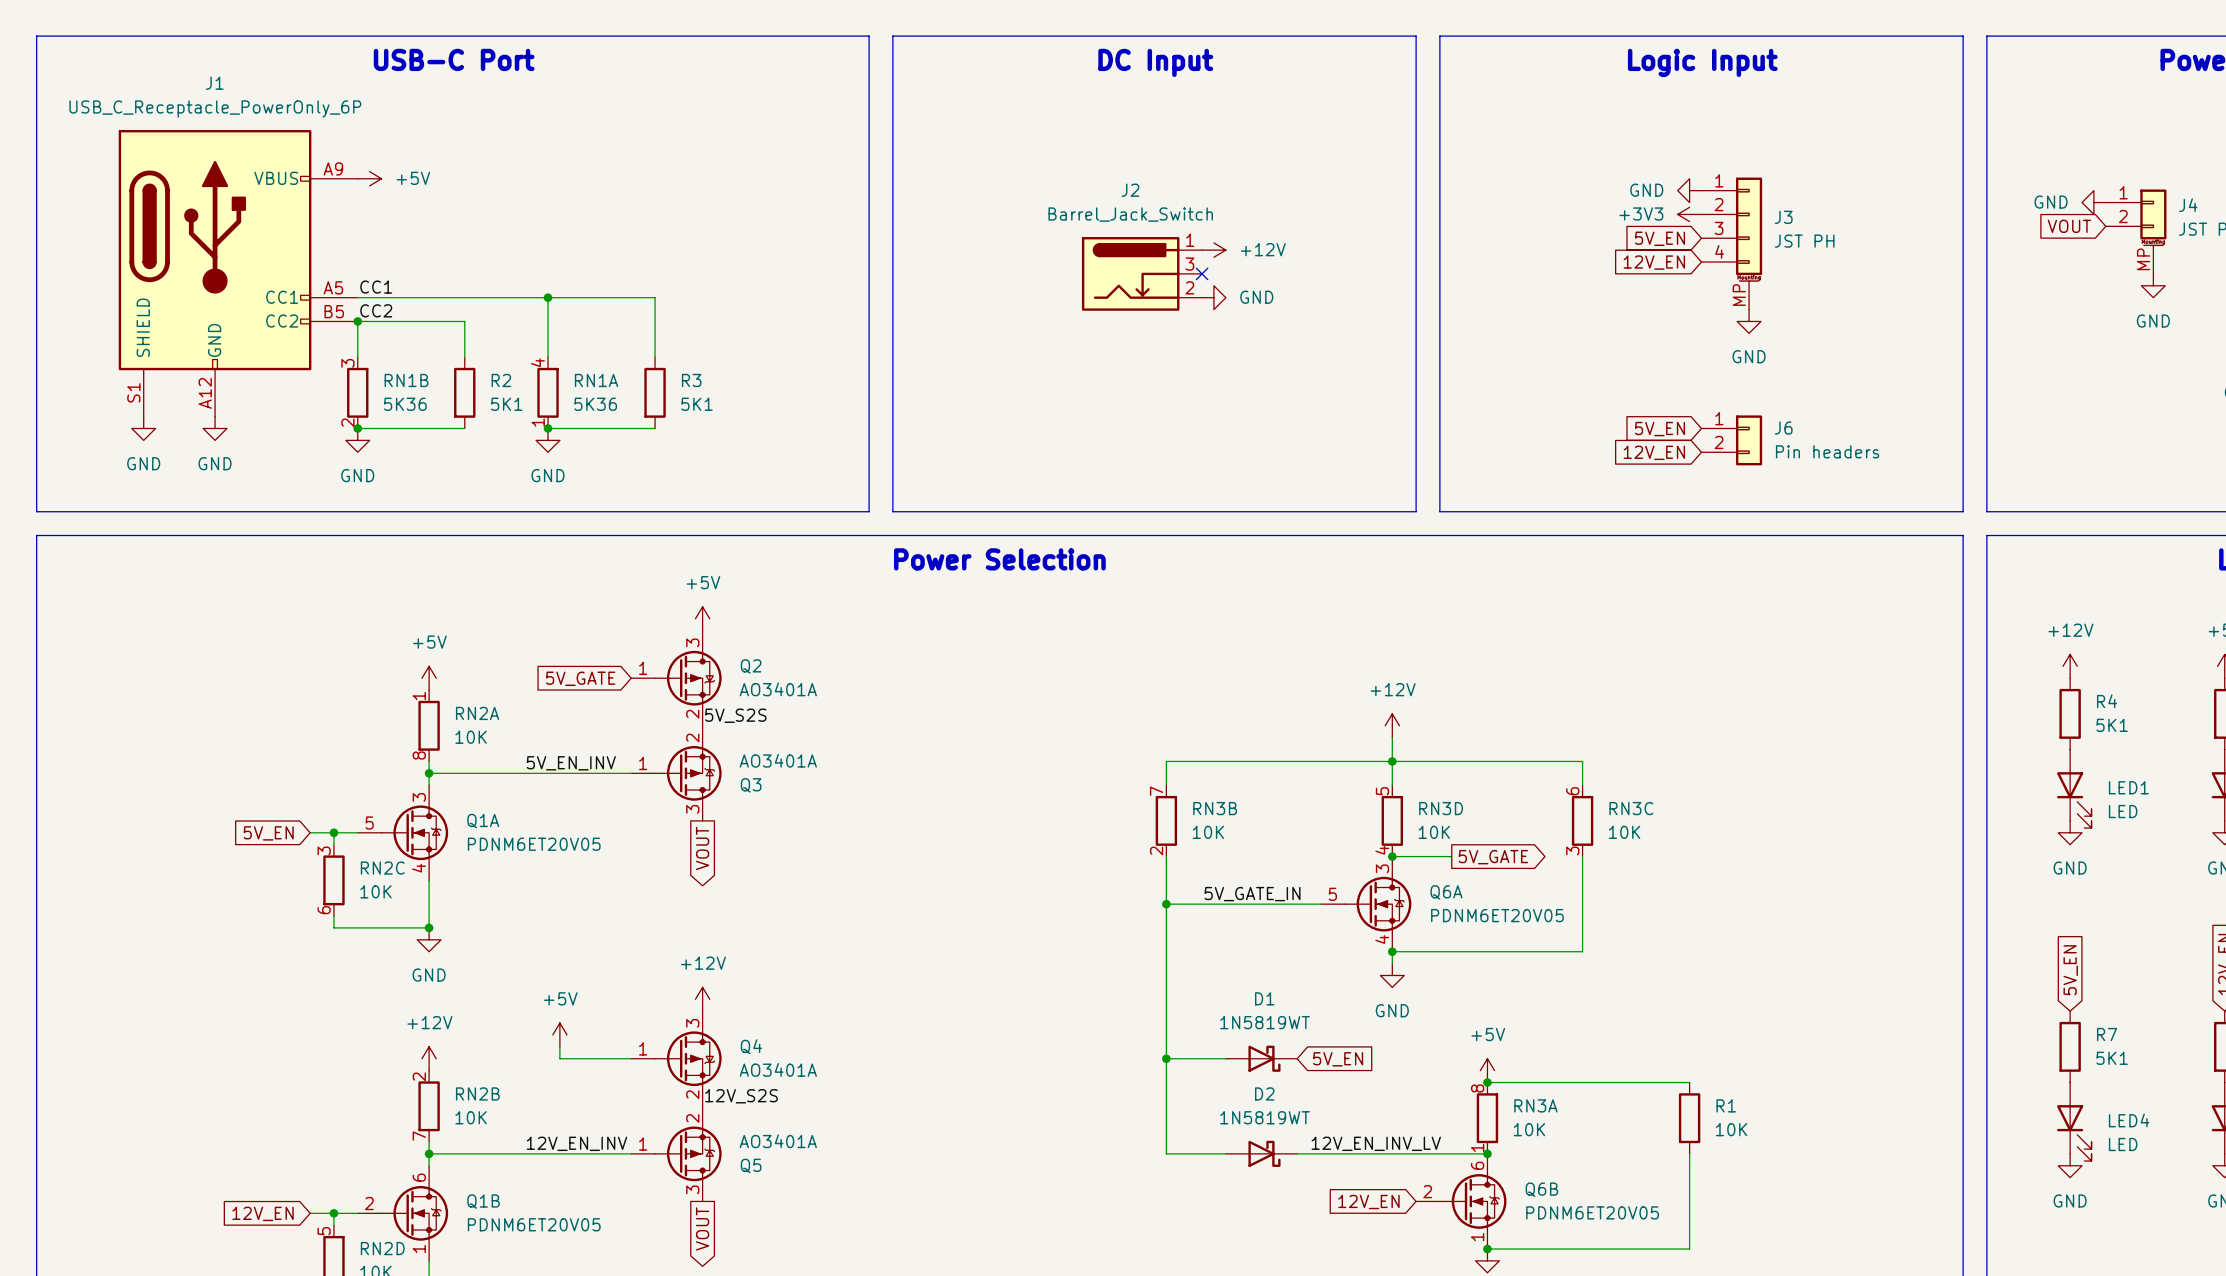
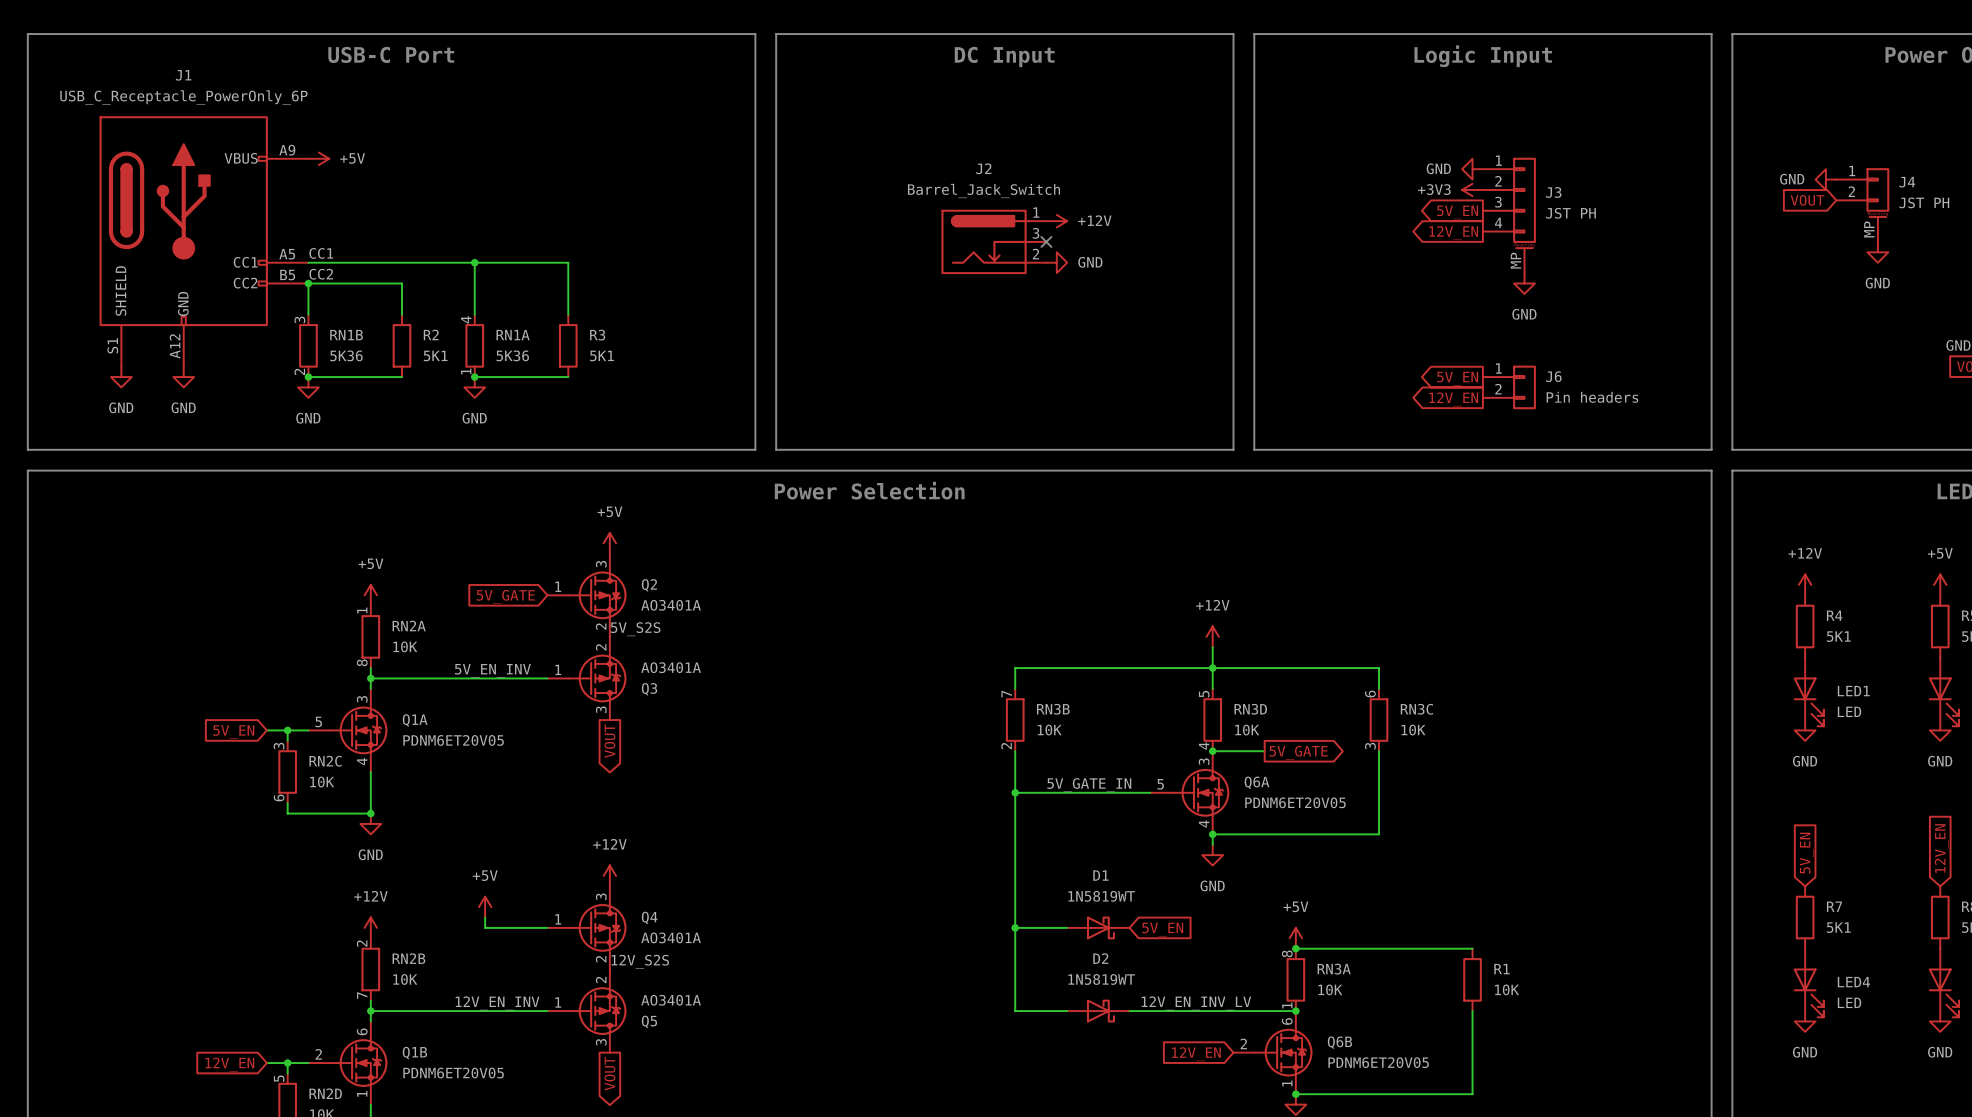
global label shape: input (1659, 238) -> output (1457, 212)
global label shape: input (1654, 262) -> output (1453, 233)
global label shape: input (1659, 429) -> output (1457, 378)
global label shape: input (1654, 452) -> output (1453, 399)

